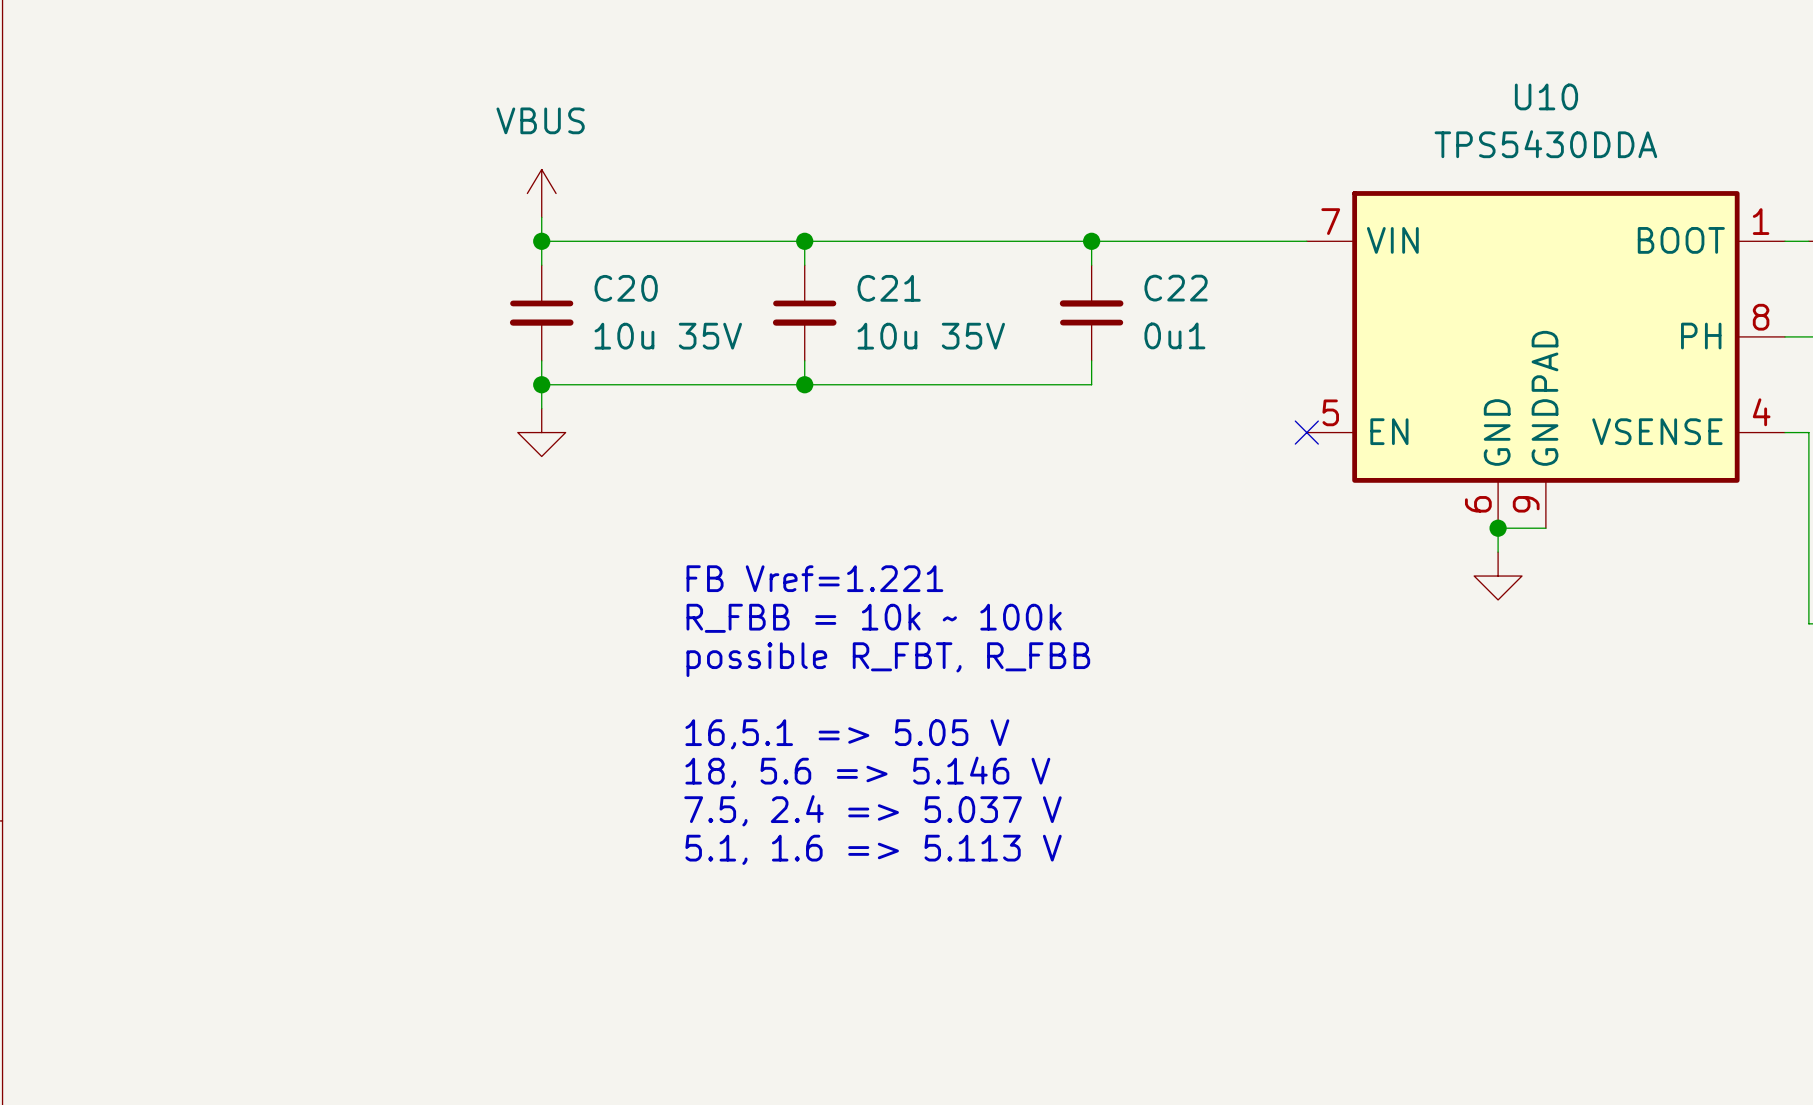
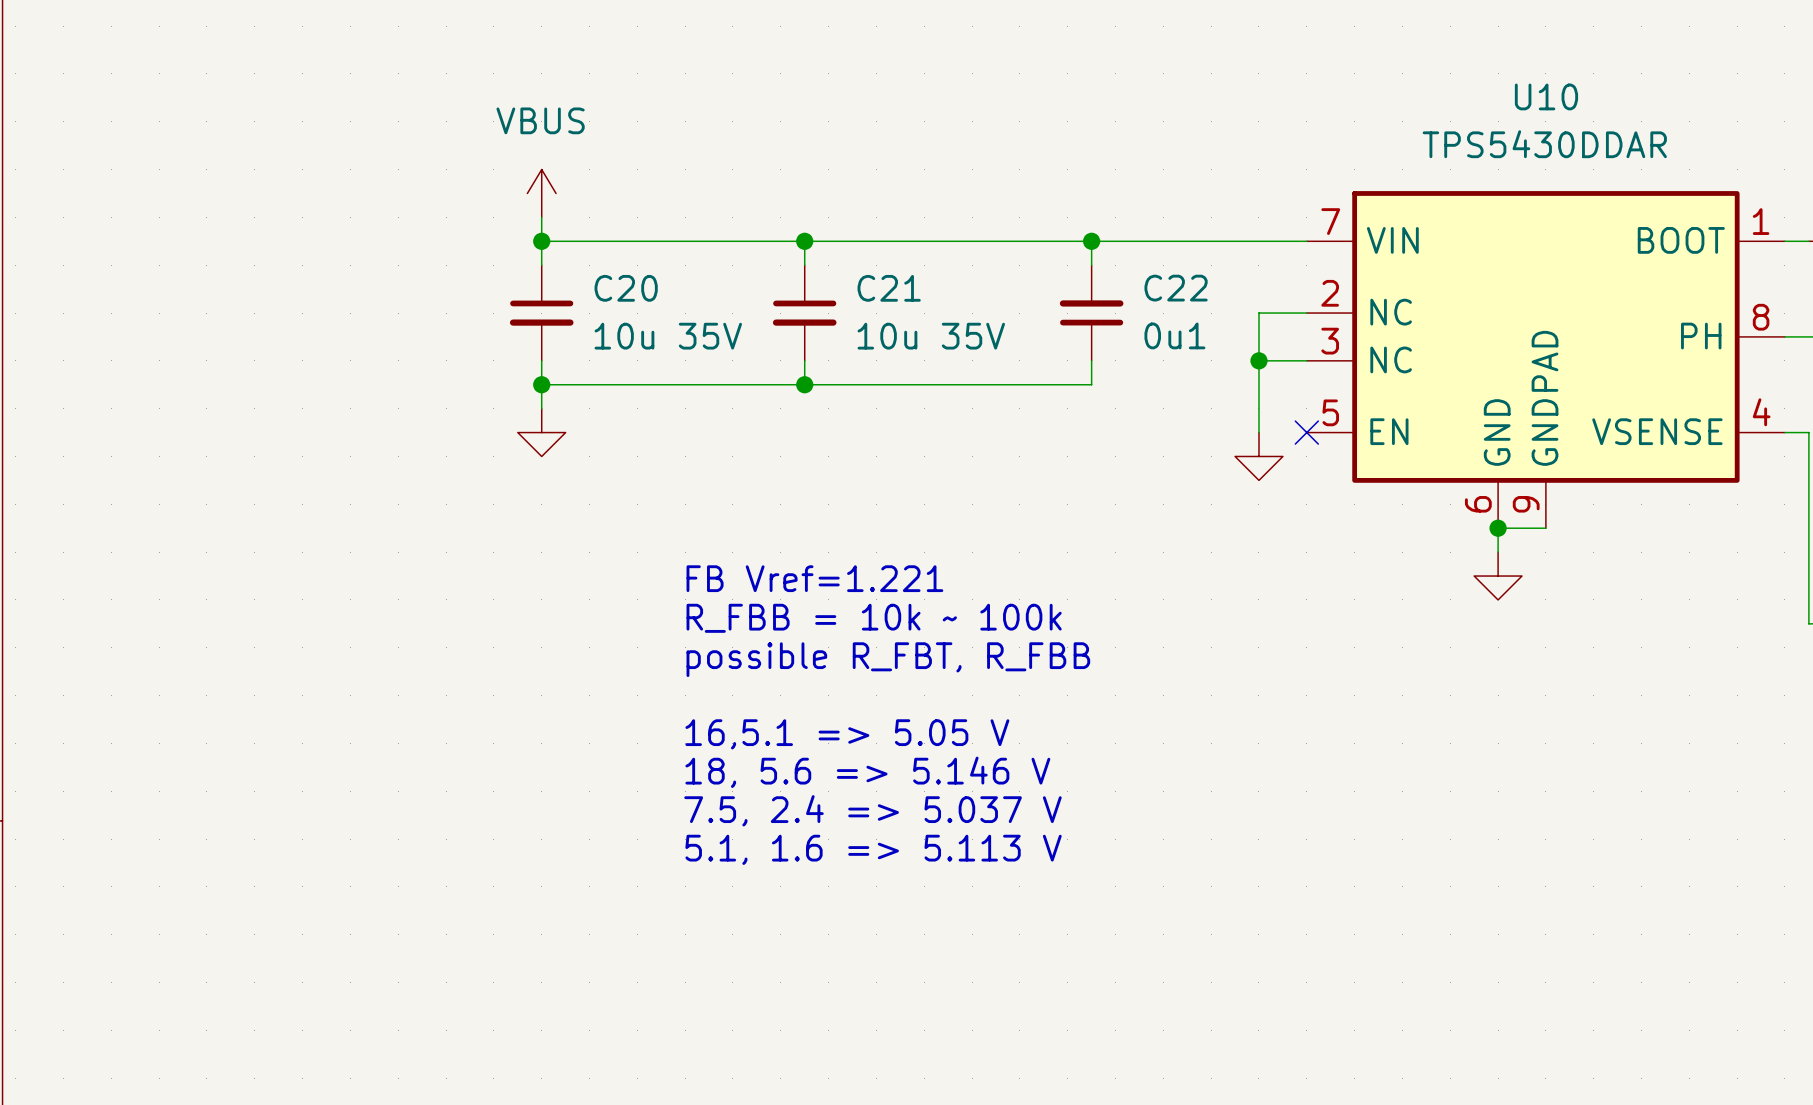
U10 value: TPS5430DDA (1545, 144) -> TPS5430DDAR (1544, 144)
U10 symbol: [1306, 191, 1785, 529] -> [1306, 191, 1785, 529]
wire: none -> (1306, 313) (1258, 313) (1258, 432)
wire: none -> (1258, 360) (1306, 360)
junction: none -> (1258, 360)
power symbol: none -> (1258, 456)

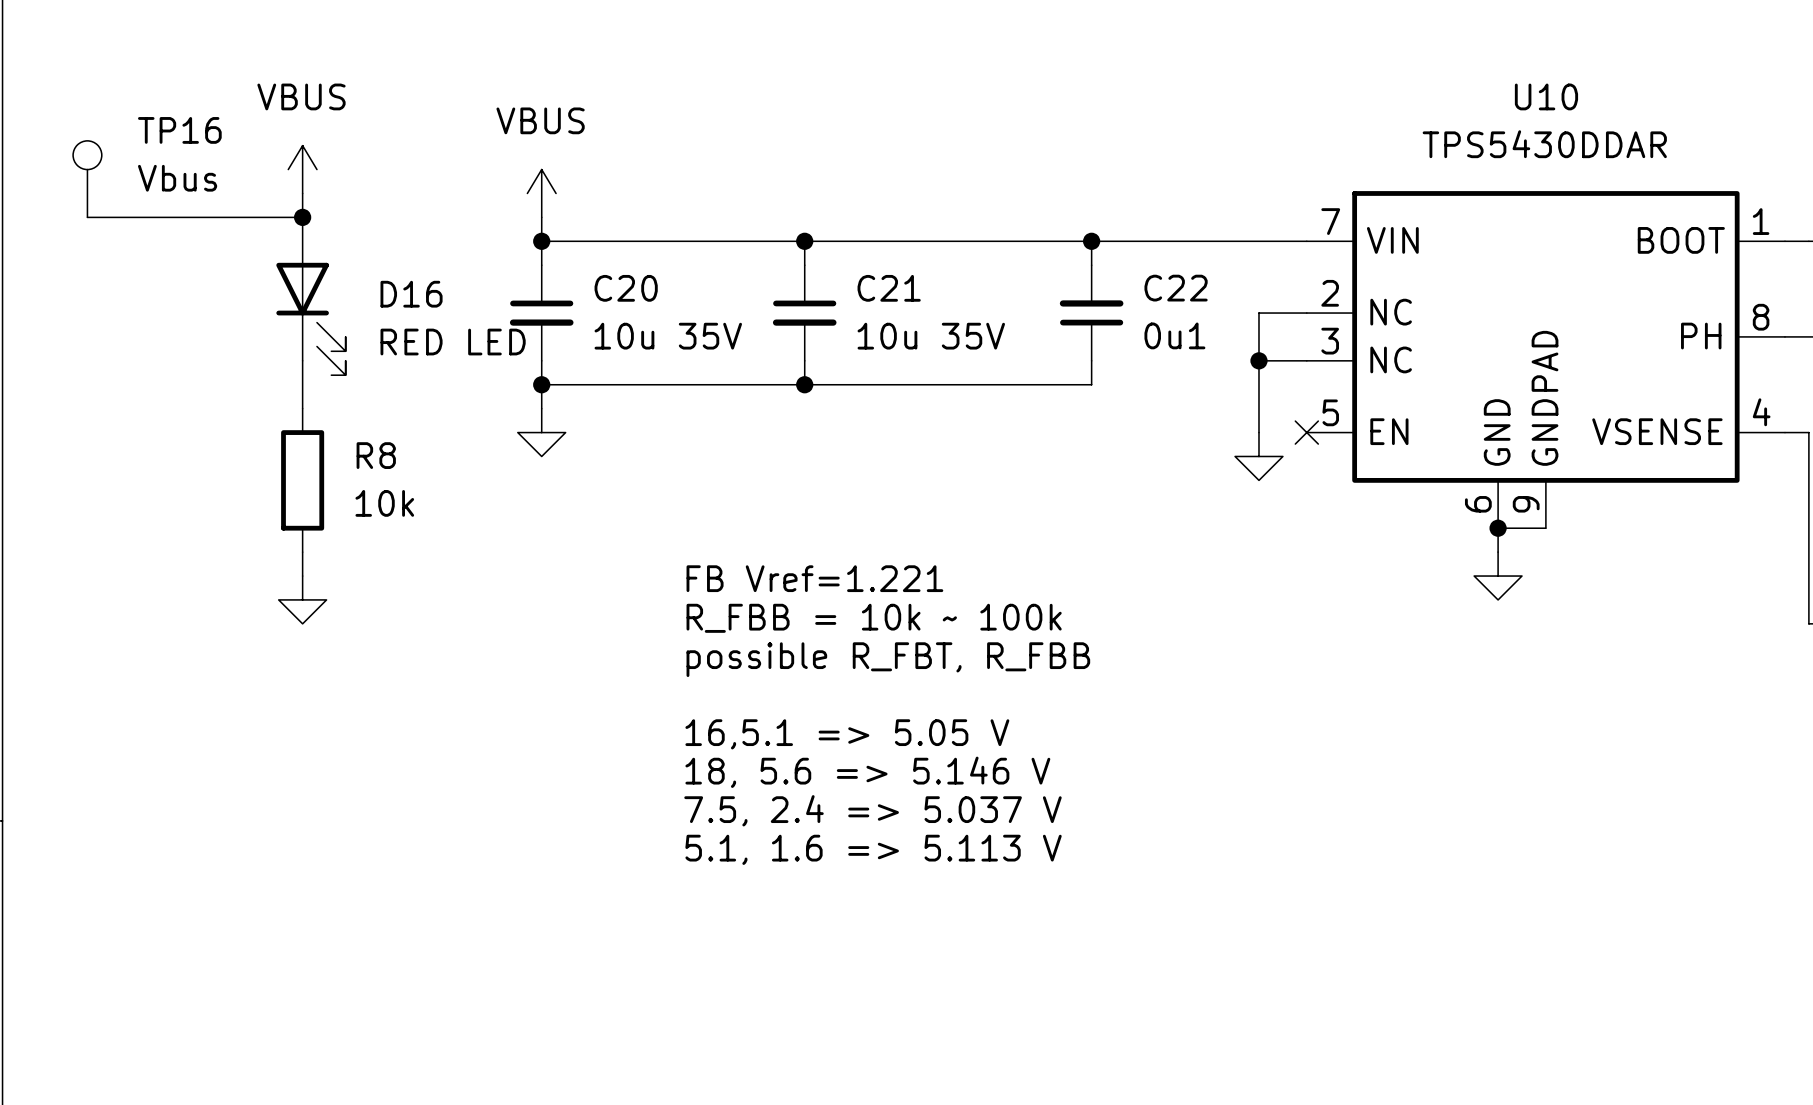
power symbol: none -> VBUS (302, 169)
TP16: none -> Vbus (87, 179)
wire: none -> (302, 193) (302, 217) (87, 217)
junction: none -> (302, 217)
D16: none -> RED LED (310, 296)
wire: none -> (302, 360) (302, 408)
R8: none -> 10k (302, 480)
wire: none -> (302, 552) (302, 576)
power symbol: none -> (302, 599)

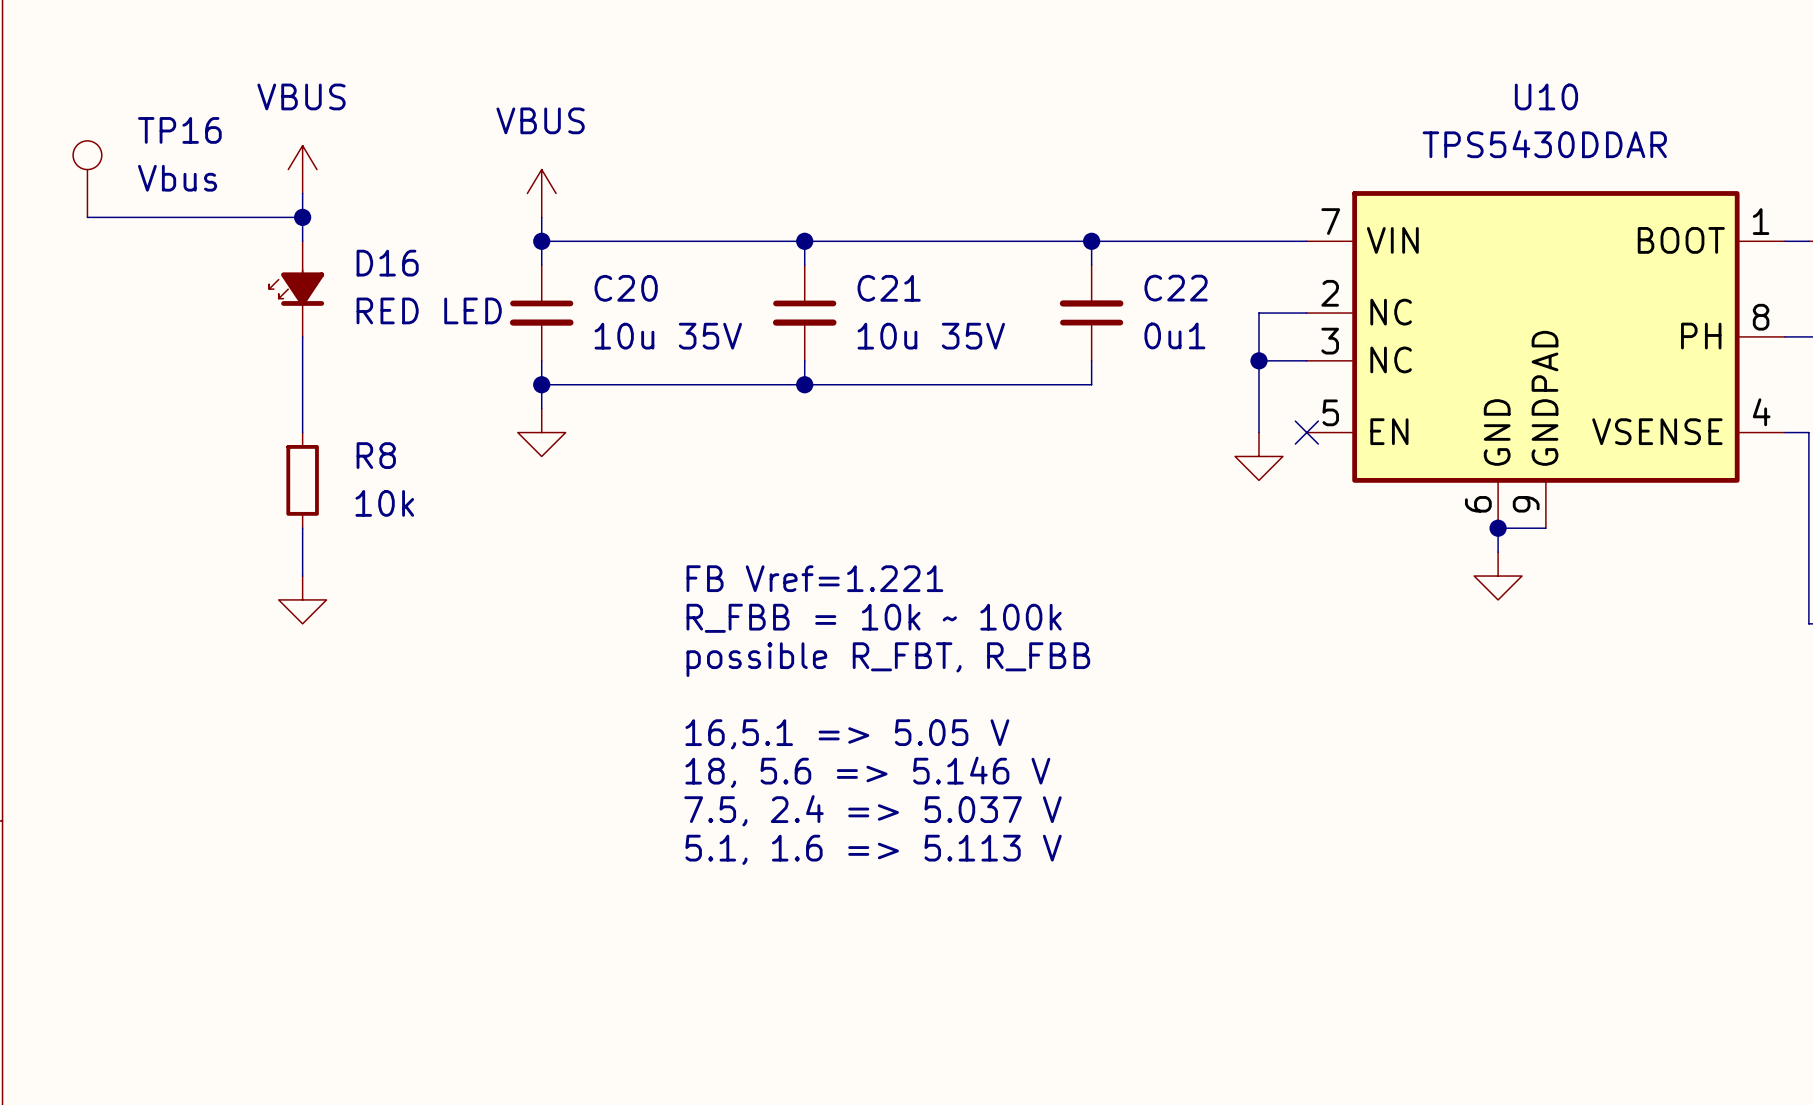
D16 symbol: [276, 217, 346, 376] -> [269, 241, 325, 337]
R8 symbol: [281, 408, 325, 553] -> [286, 432, 319, 529]

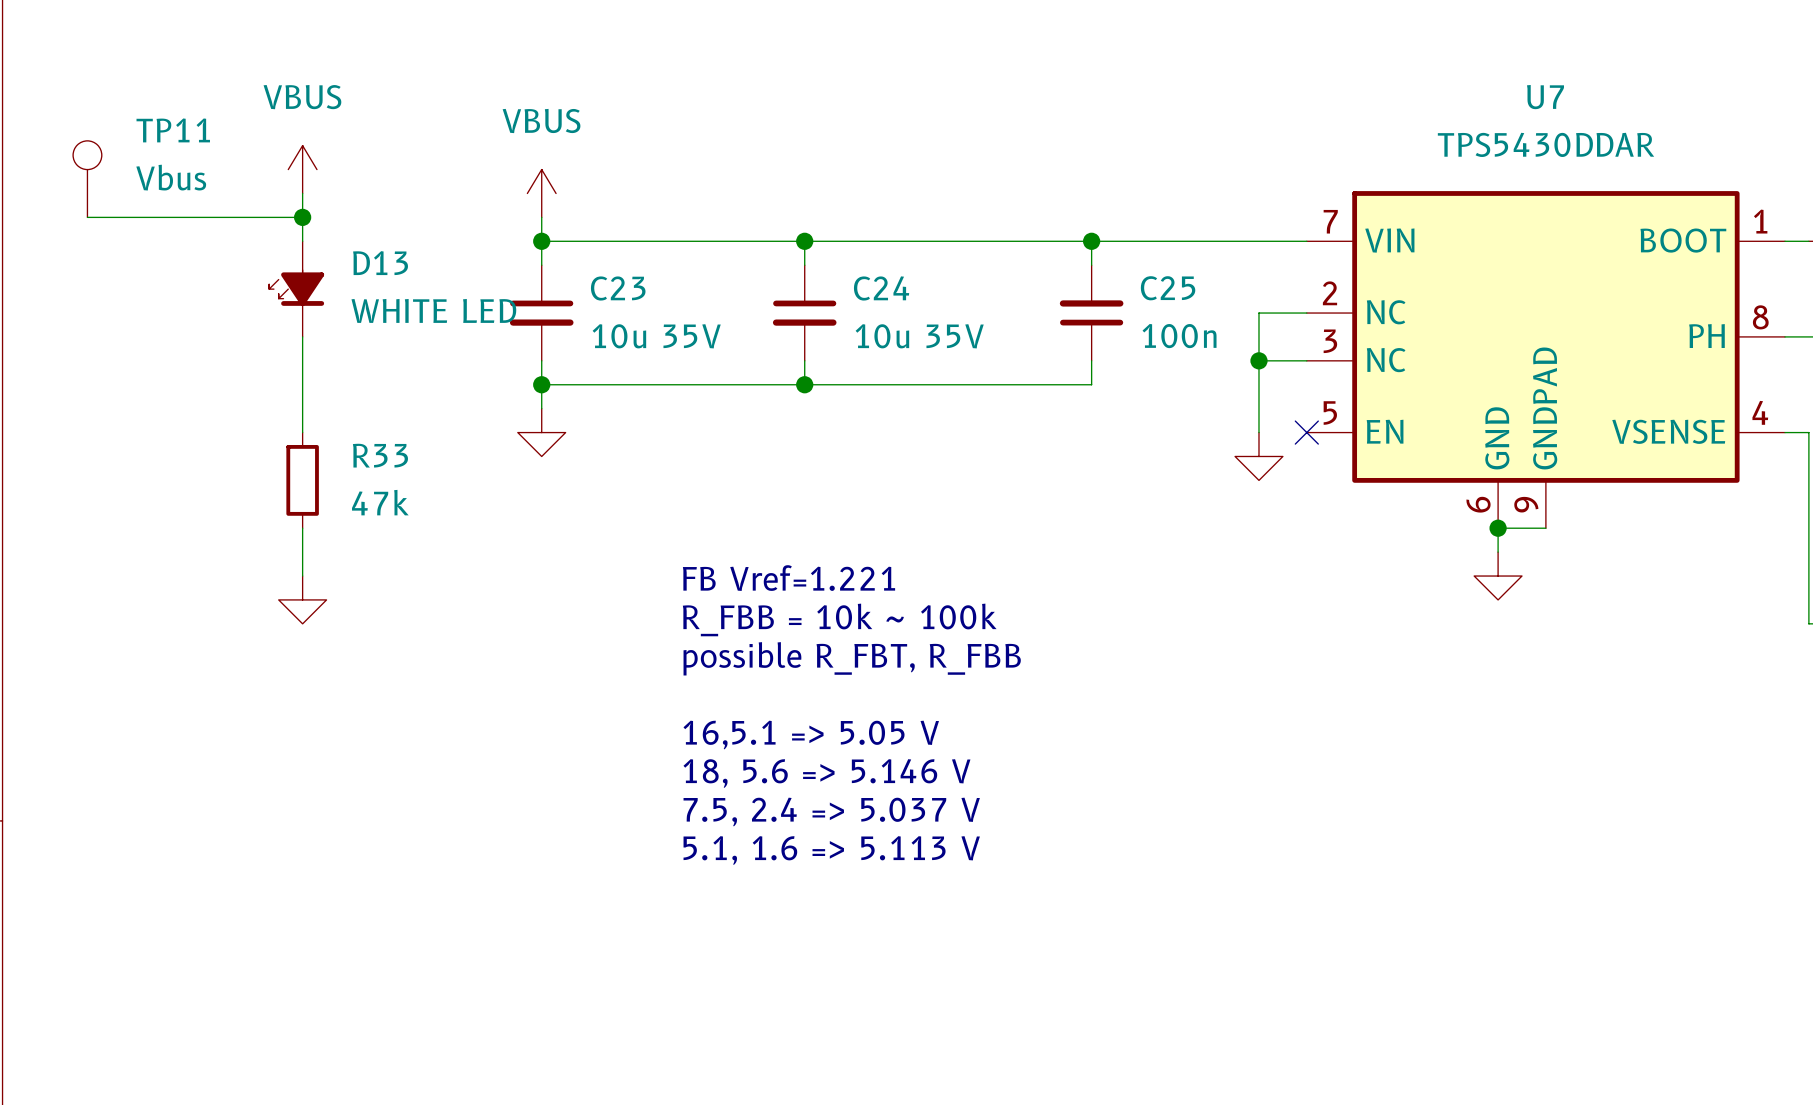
U10 name: U10 (1546, 96) -> U7 (1545, 97)
TP16 name: TP16 (179, 130) -> TP11 (173, 130)
D16 name: D16 (387, 263) -> D13 (380, 263)
C20 name: C20 (626, 288) -> C23 (618, 288)
C21 name: C21 (889, 288) -> C24 (881, 288)
C22 name: C22 (1176, 288) -> C25 (1168, 288)
D16 value: RED LED (429, 310) -> WHITE LED (433, 310)
C22 value: 0u1 (1174, 335) -> 100n (1179, 336)
R8 name: R8 (376, 455) -> R33 (380, 455)
R8 value: 10k (384, 503) -> 47k (380, 502)

